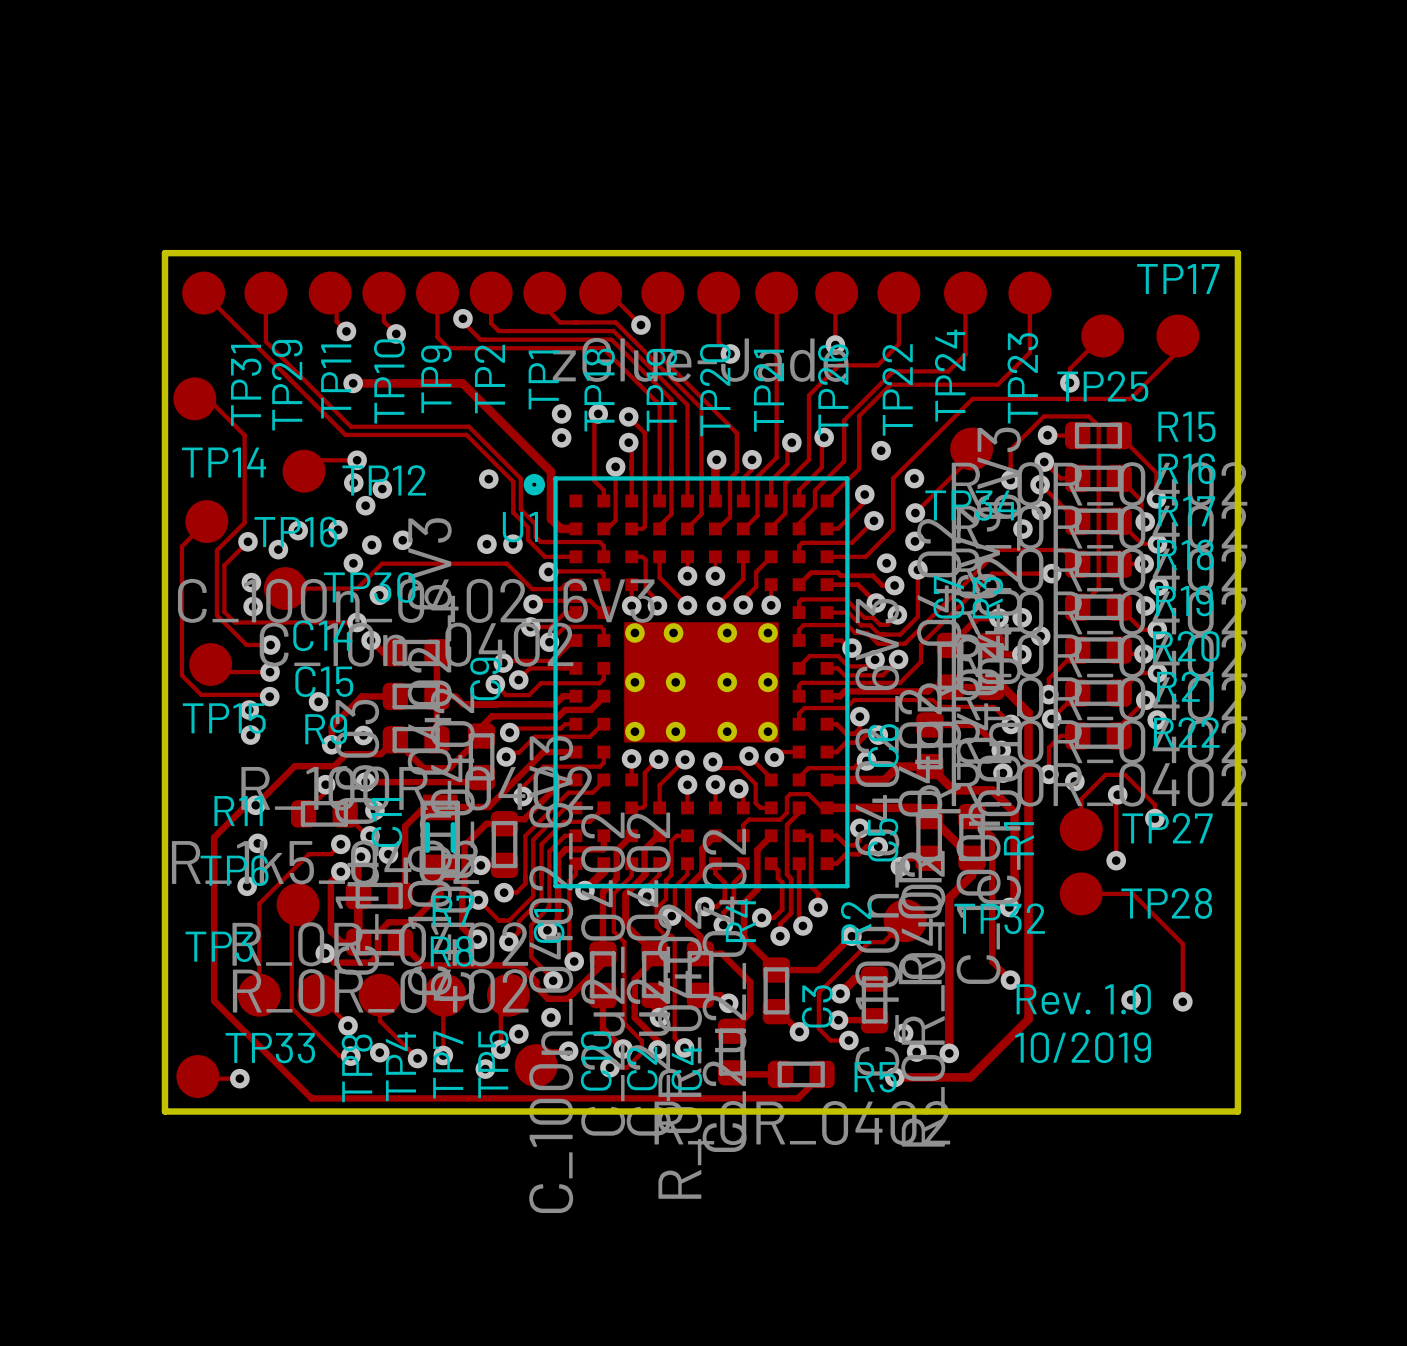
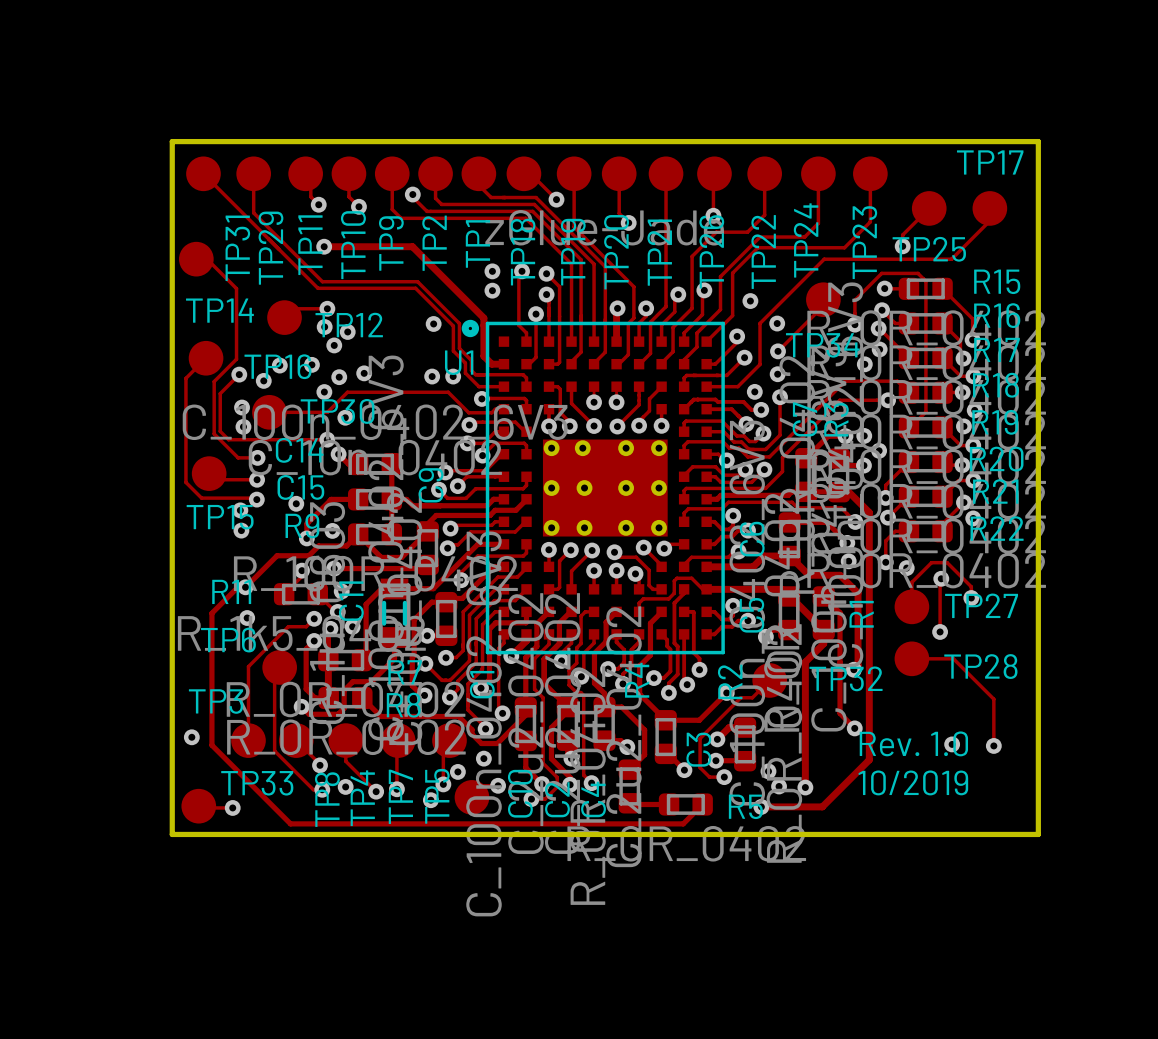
via position: (247, 886) -> (191, 737)

